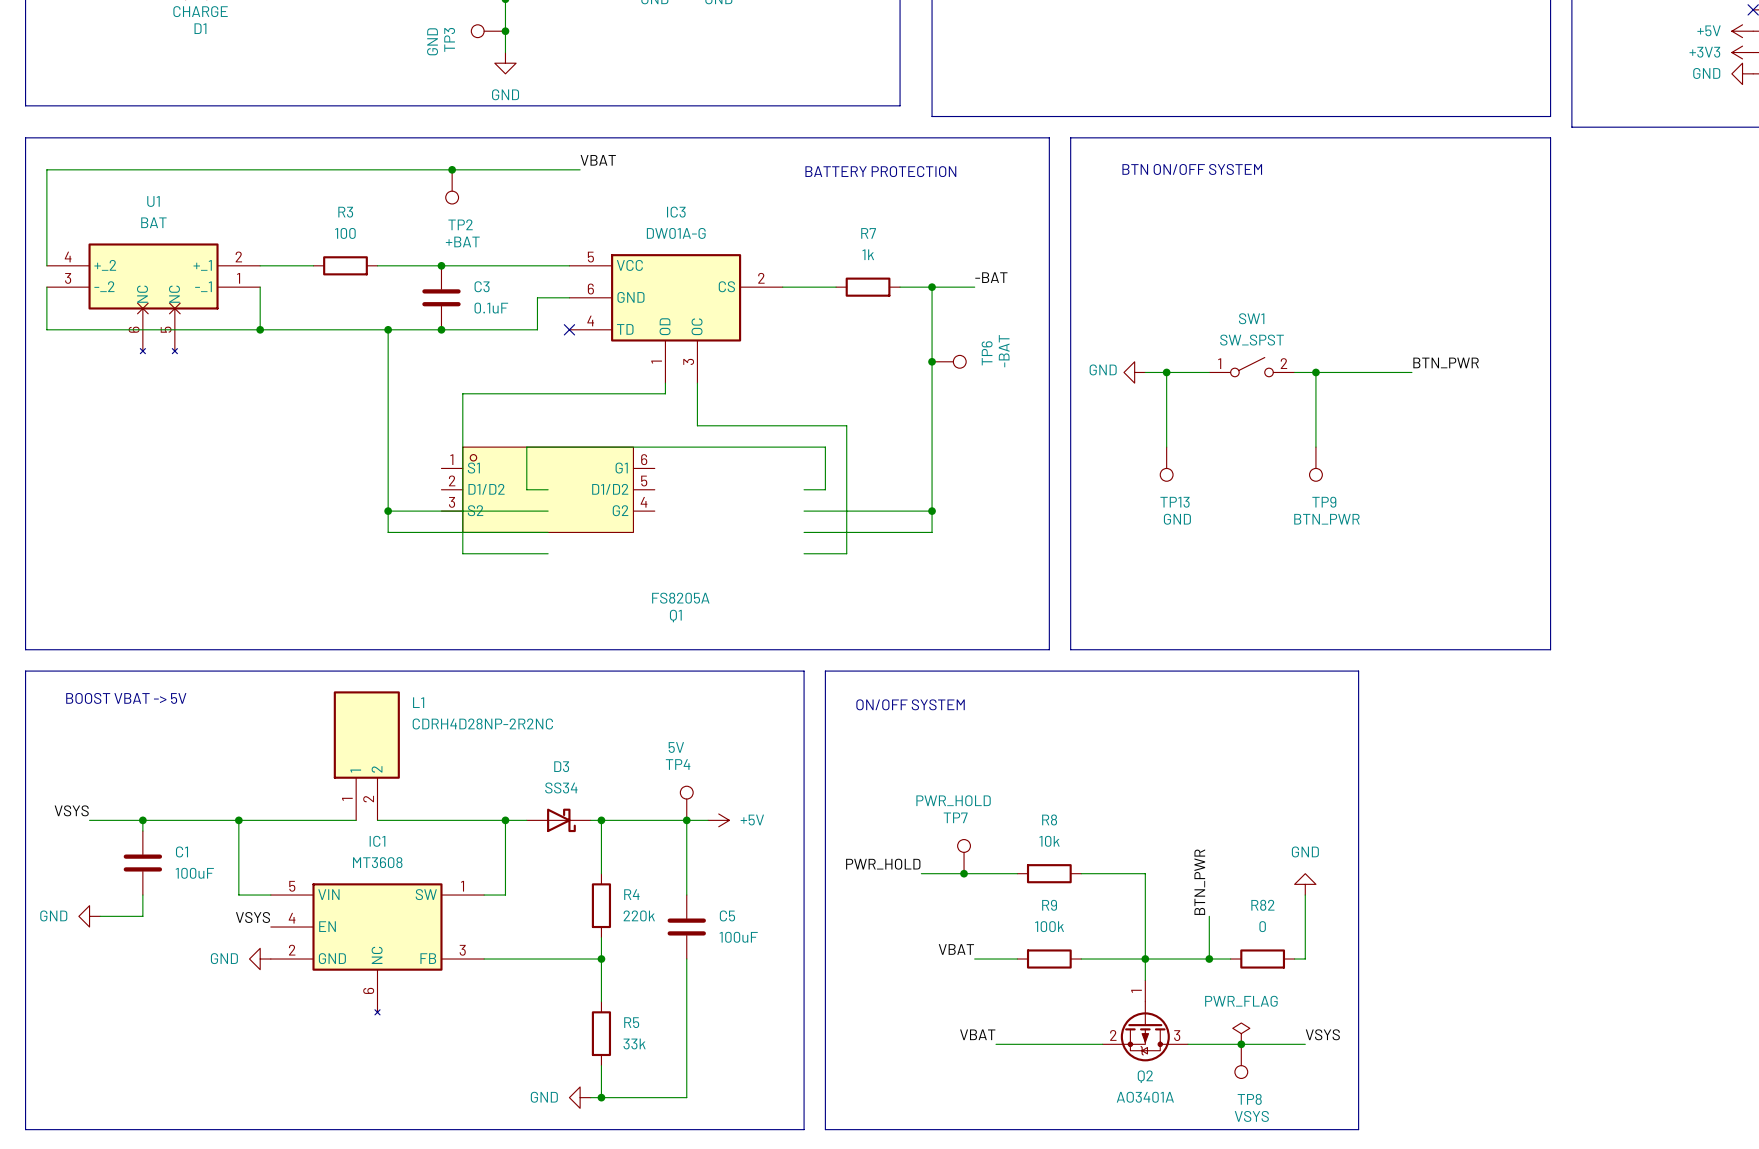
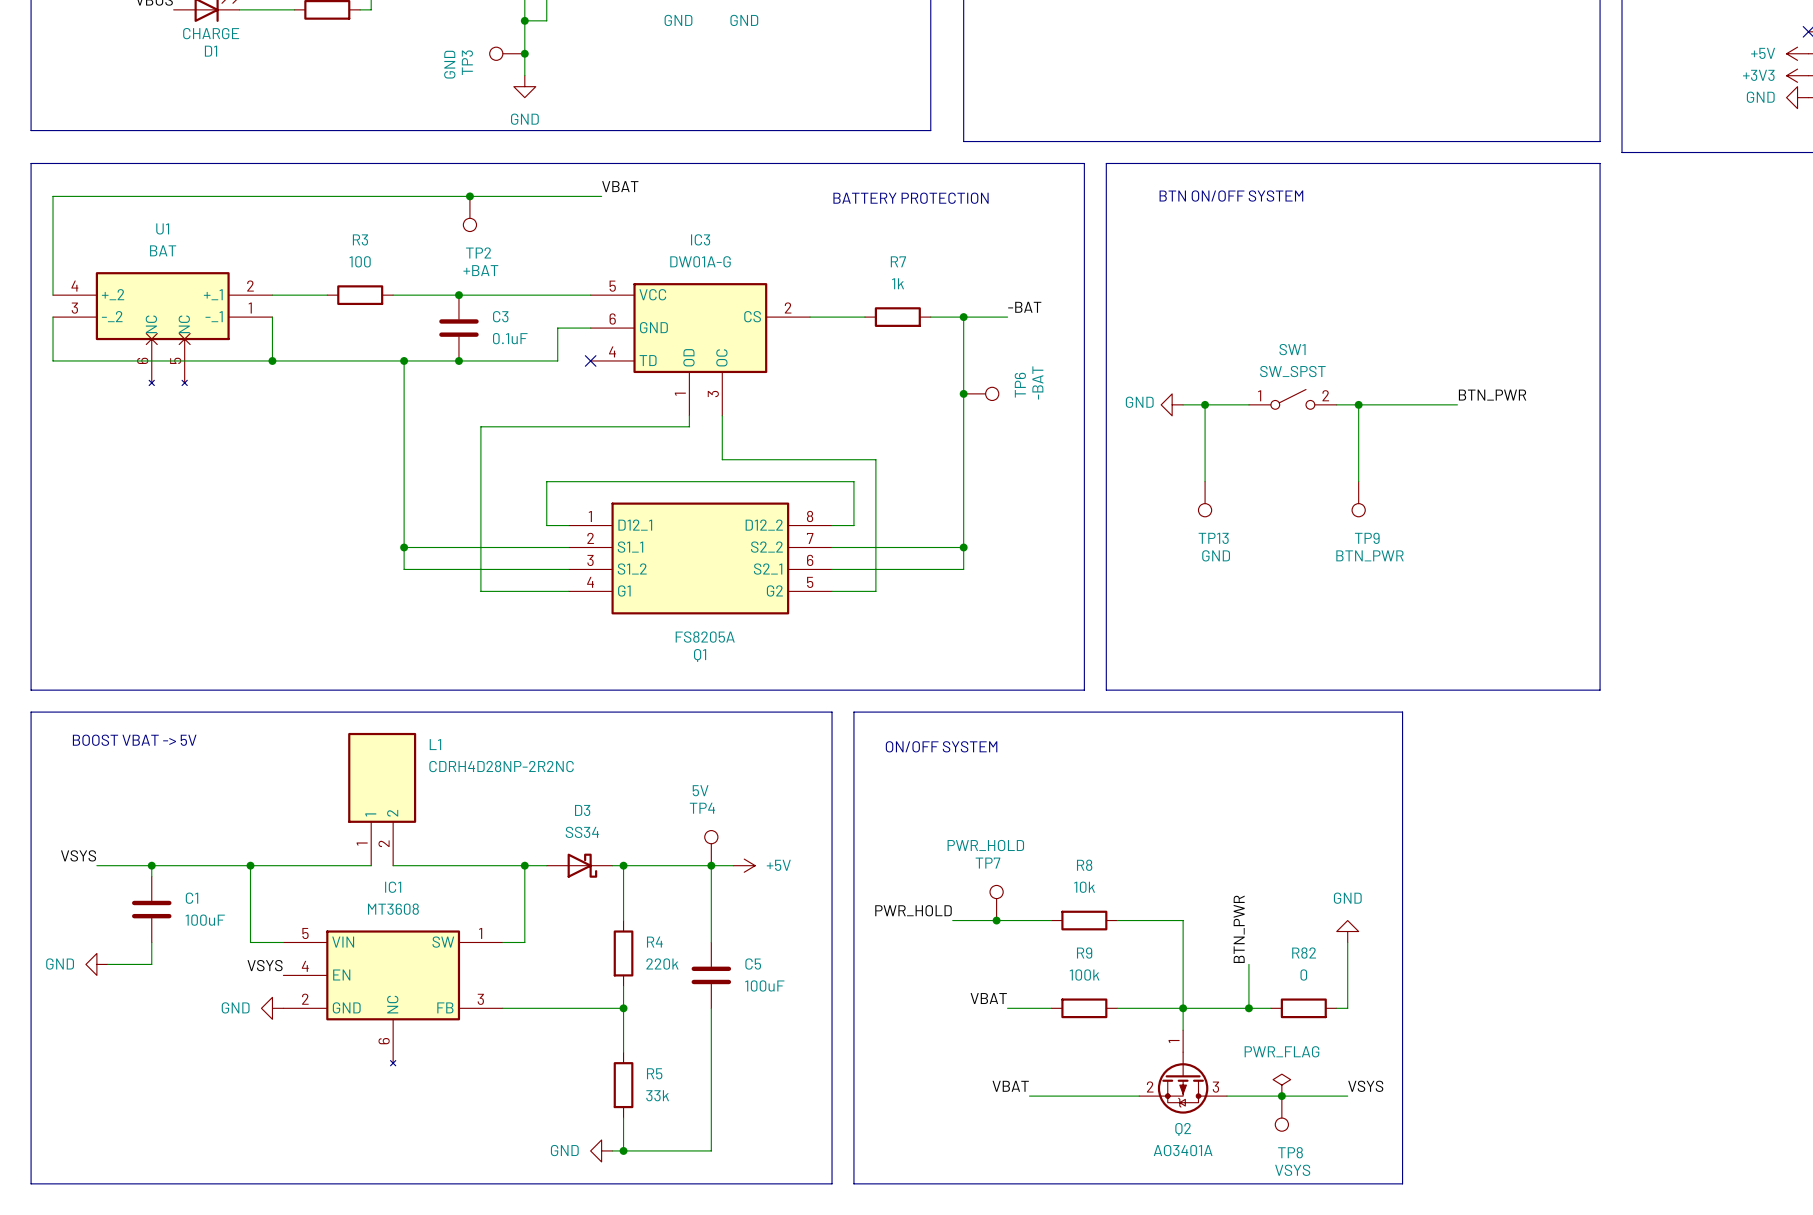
Q1 symbol: [441, 447, 655, 533] -> [568, 502, 833, 615]

